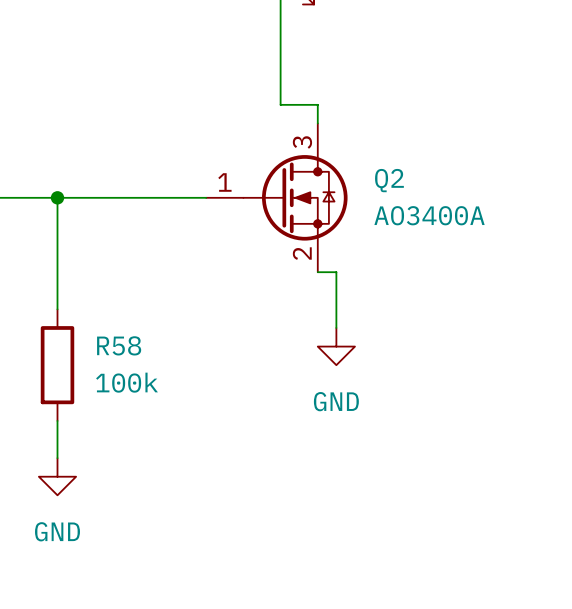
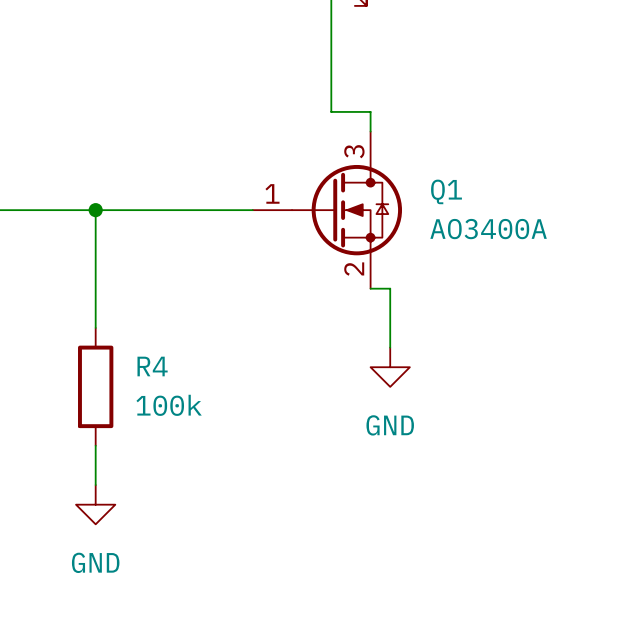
Q2 name: Q2 (389, 180) -> Q1 (446, 191)
R58 name: R58 (119, 345) -> R4 (152, 366)

